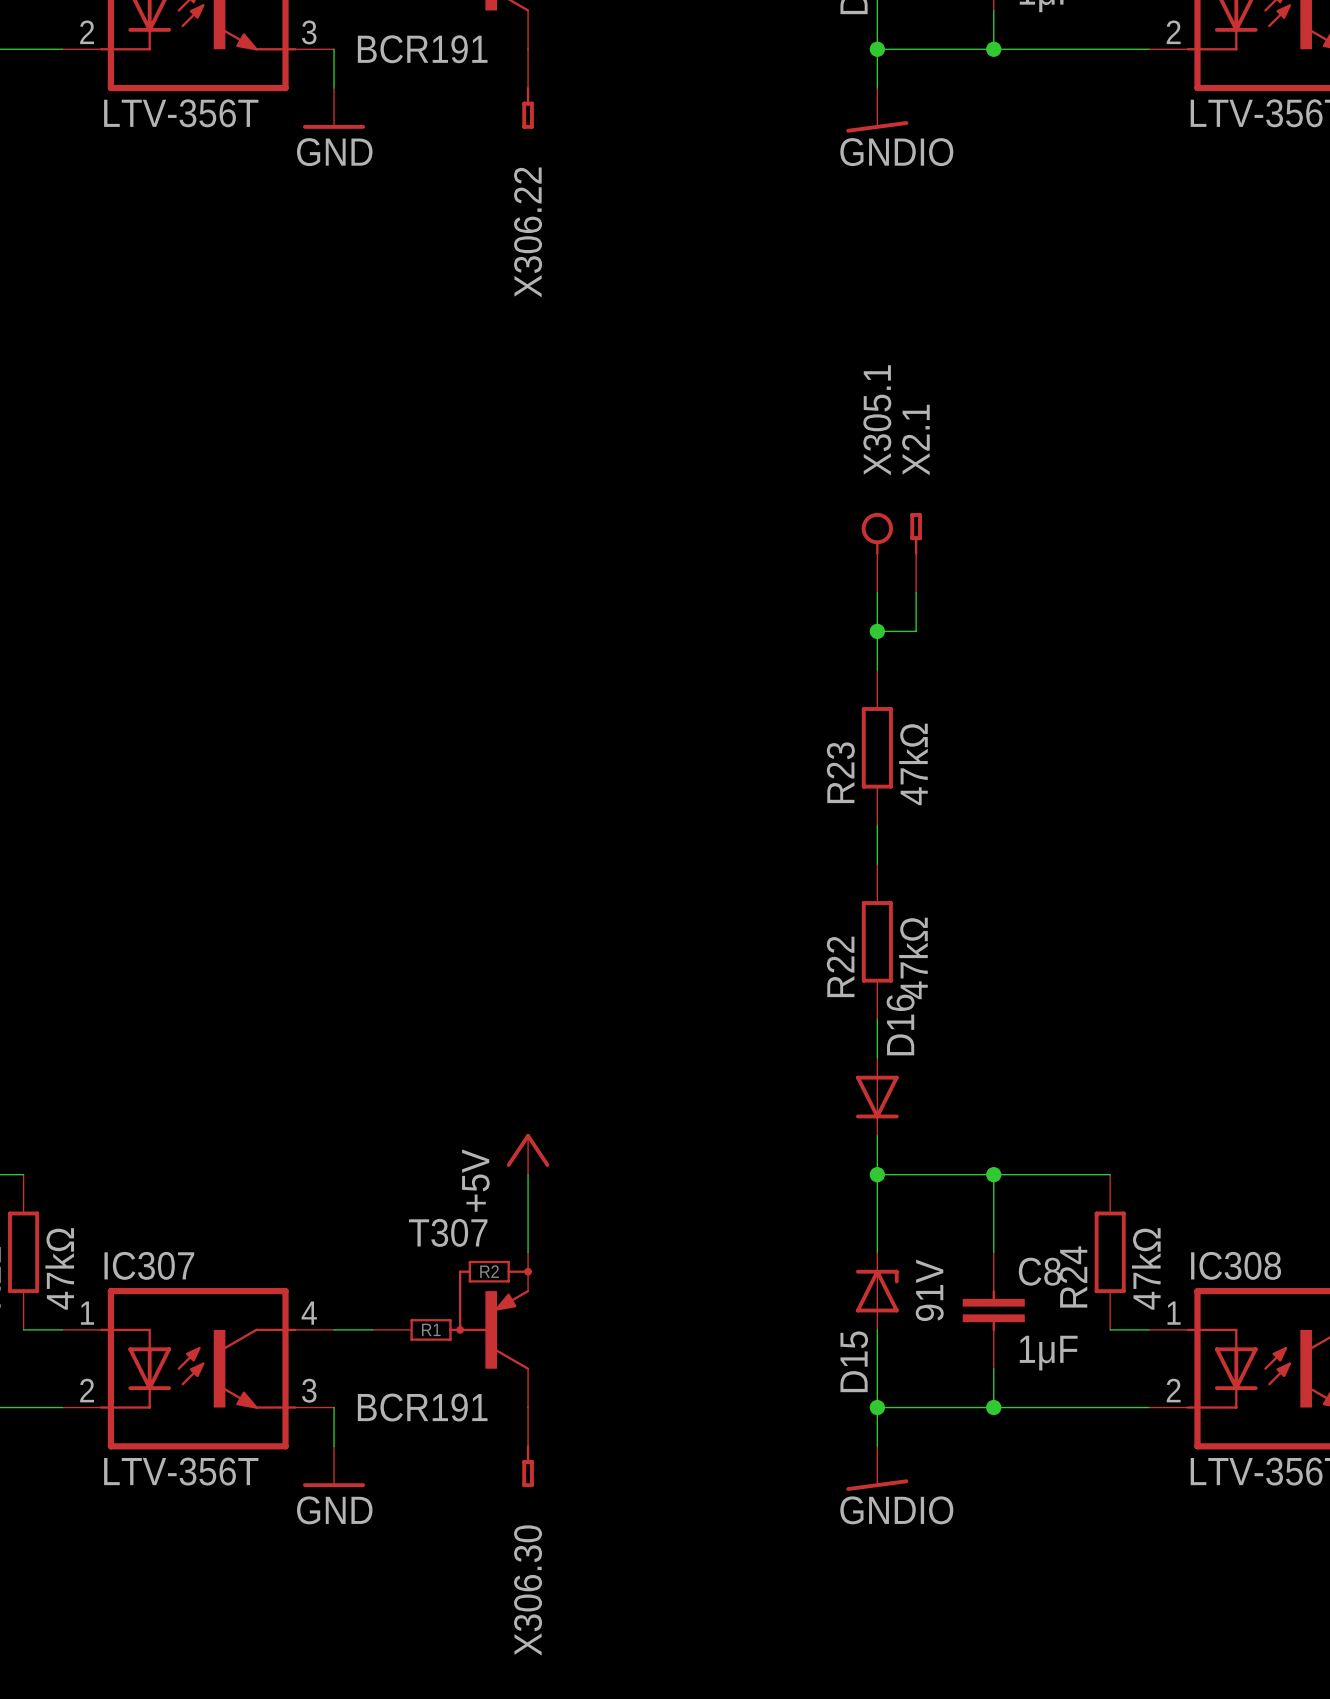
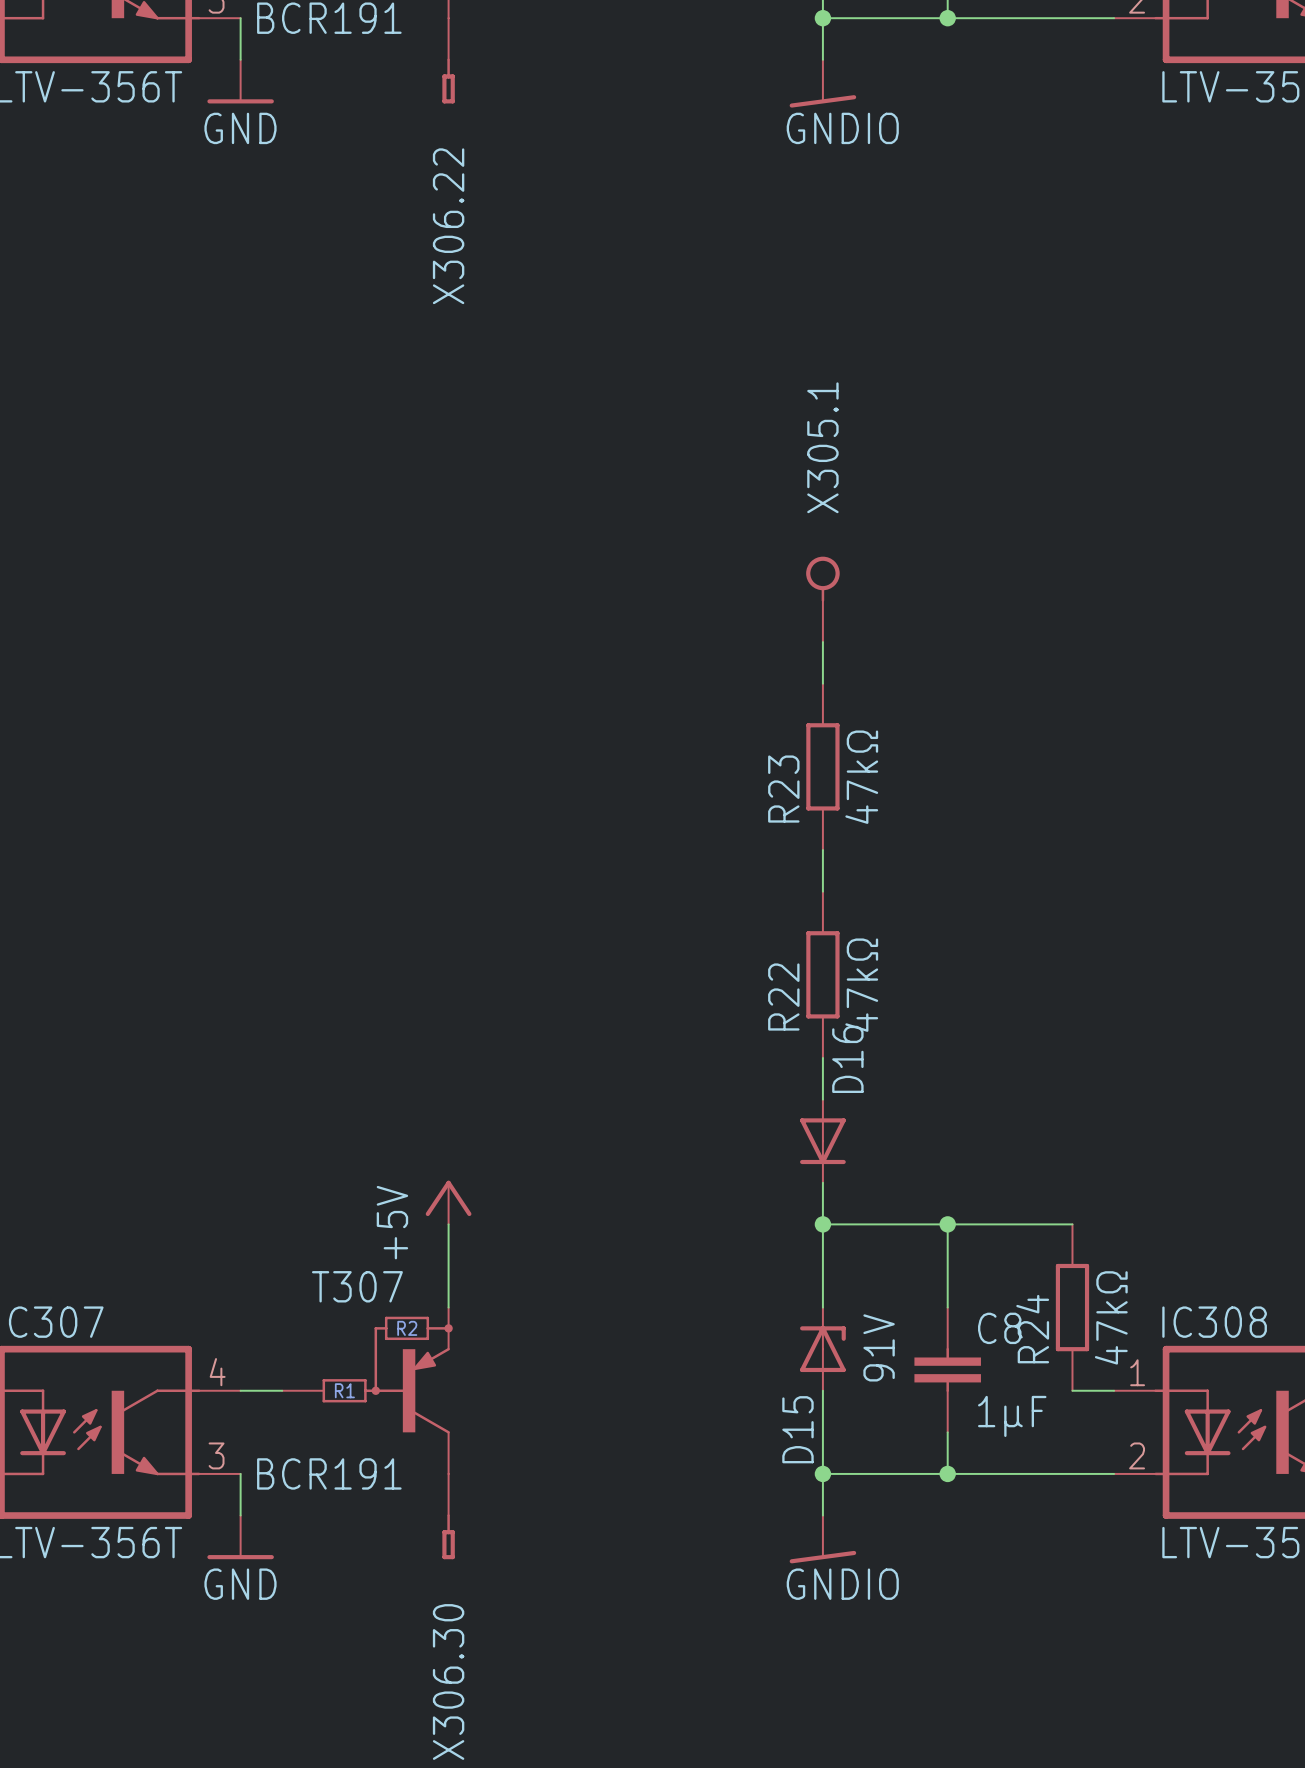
X305.1 position: (877, 552) -> (822, 599)
X2.1: (916, 552) -> none
wire: (877, 592) (877, 631) (916, 631) (916, 592) -> none
junction: (877, 631) -> none

